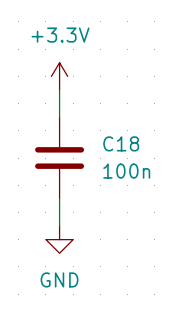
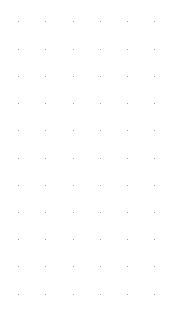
power symbol: +3.3V (59, 76) -> none
wire: (59, 89) (59, 117) -> none
C18: 100n (59, 158) -> none
wire: (59, 198) (59, 226) -> none
power symbol: GND (59, 239) -> none

